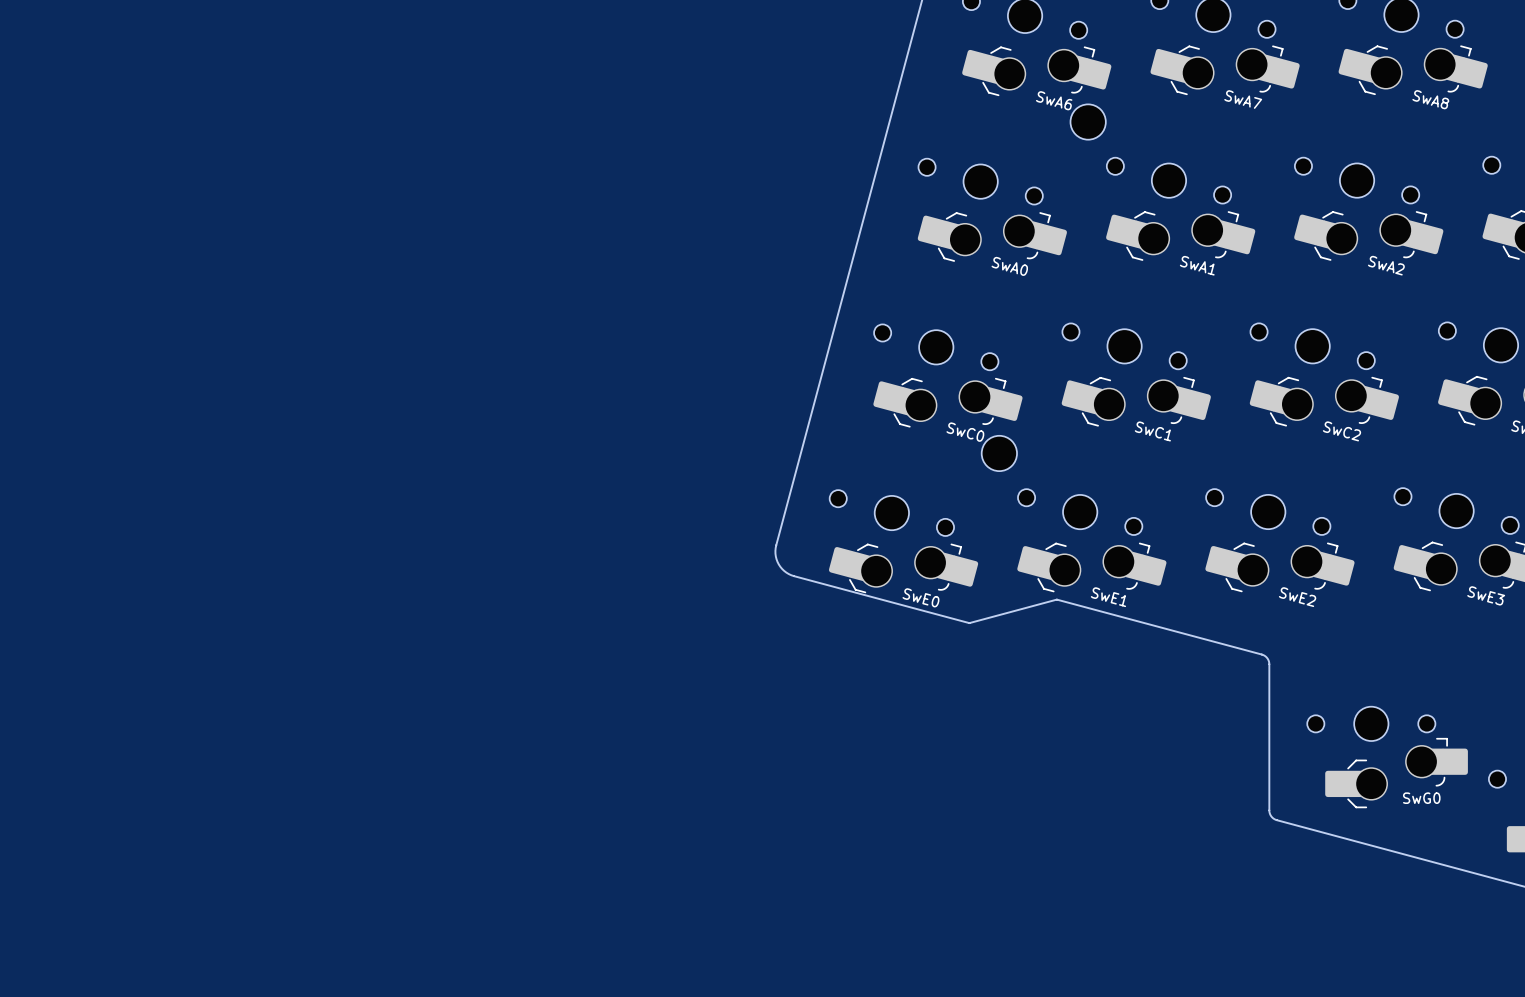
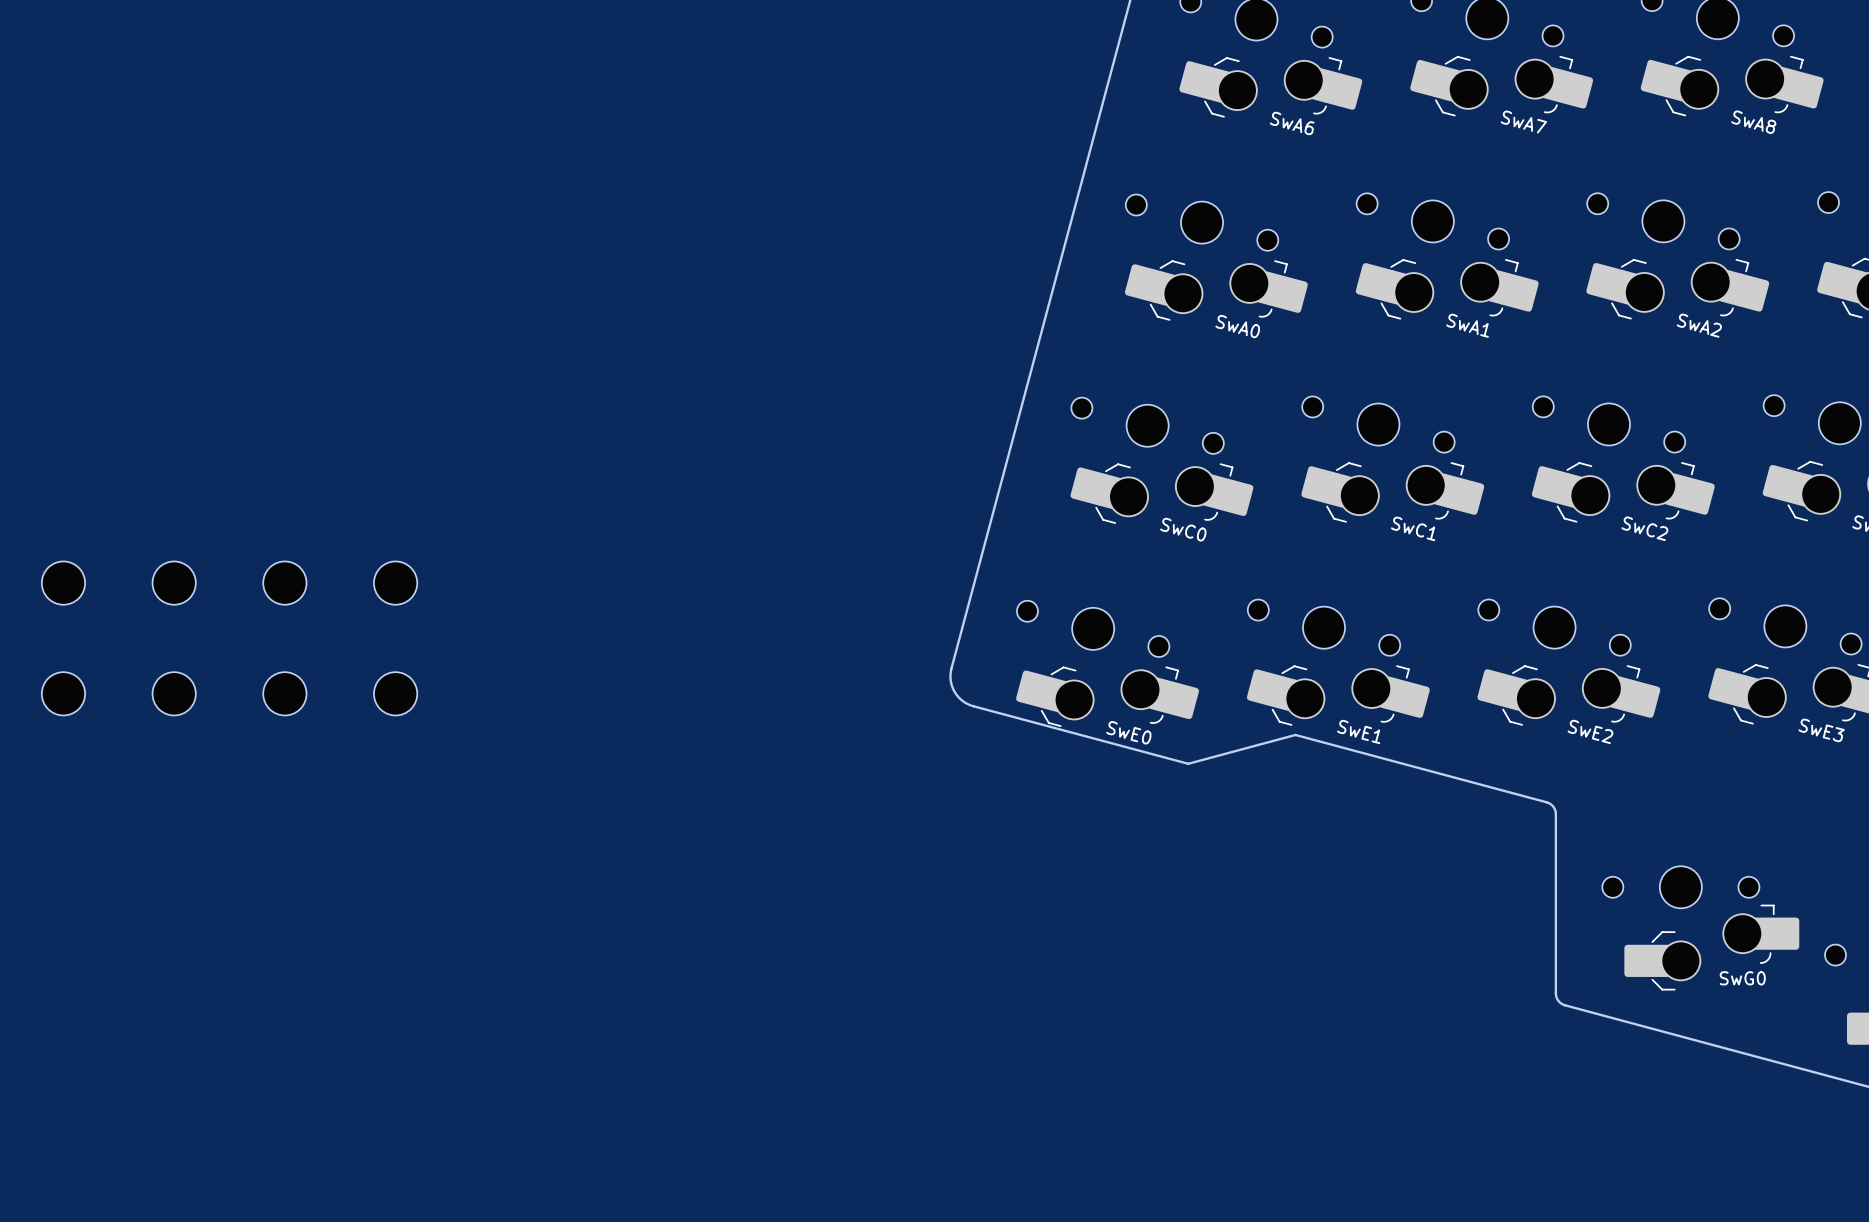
part: (1088, 122) -> none
part: (999, 453) -> none
part: none -> (63, 583)
part: none -> (174, 583)
part: none -> (284, 583)
part: none -> (395, 583)
part: none -> (63, 693)
part: none -> (174, 693)
part: none -> (284, 693)
part: none -> (395, 693)

